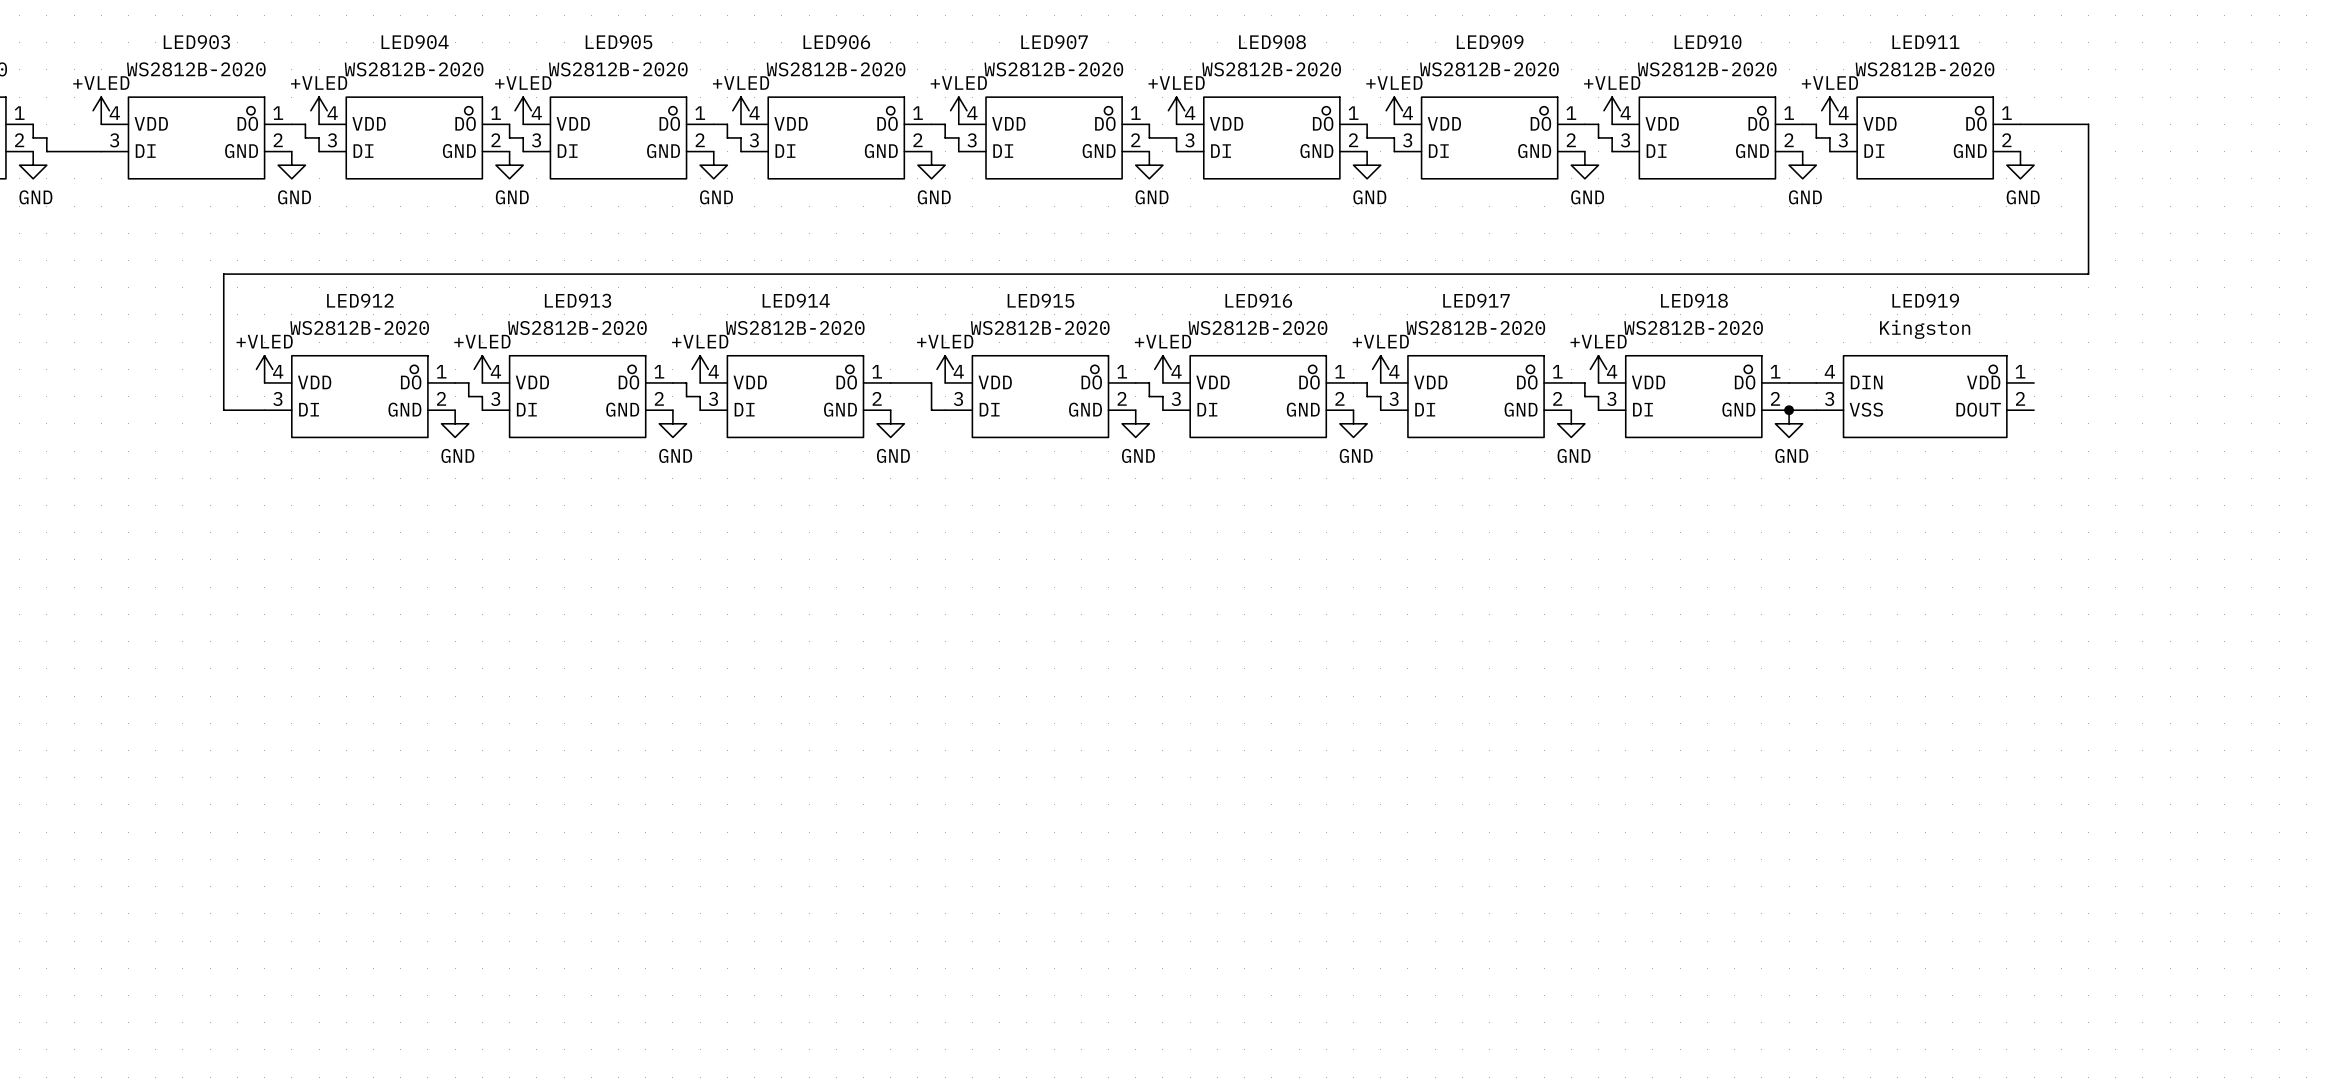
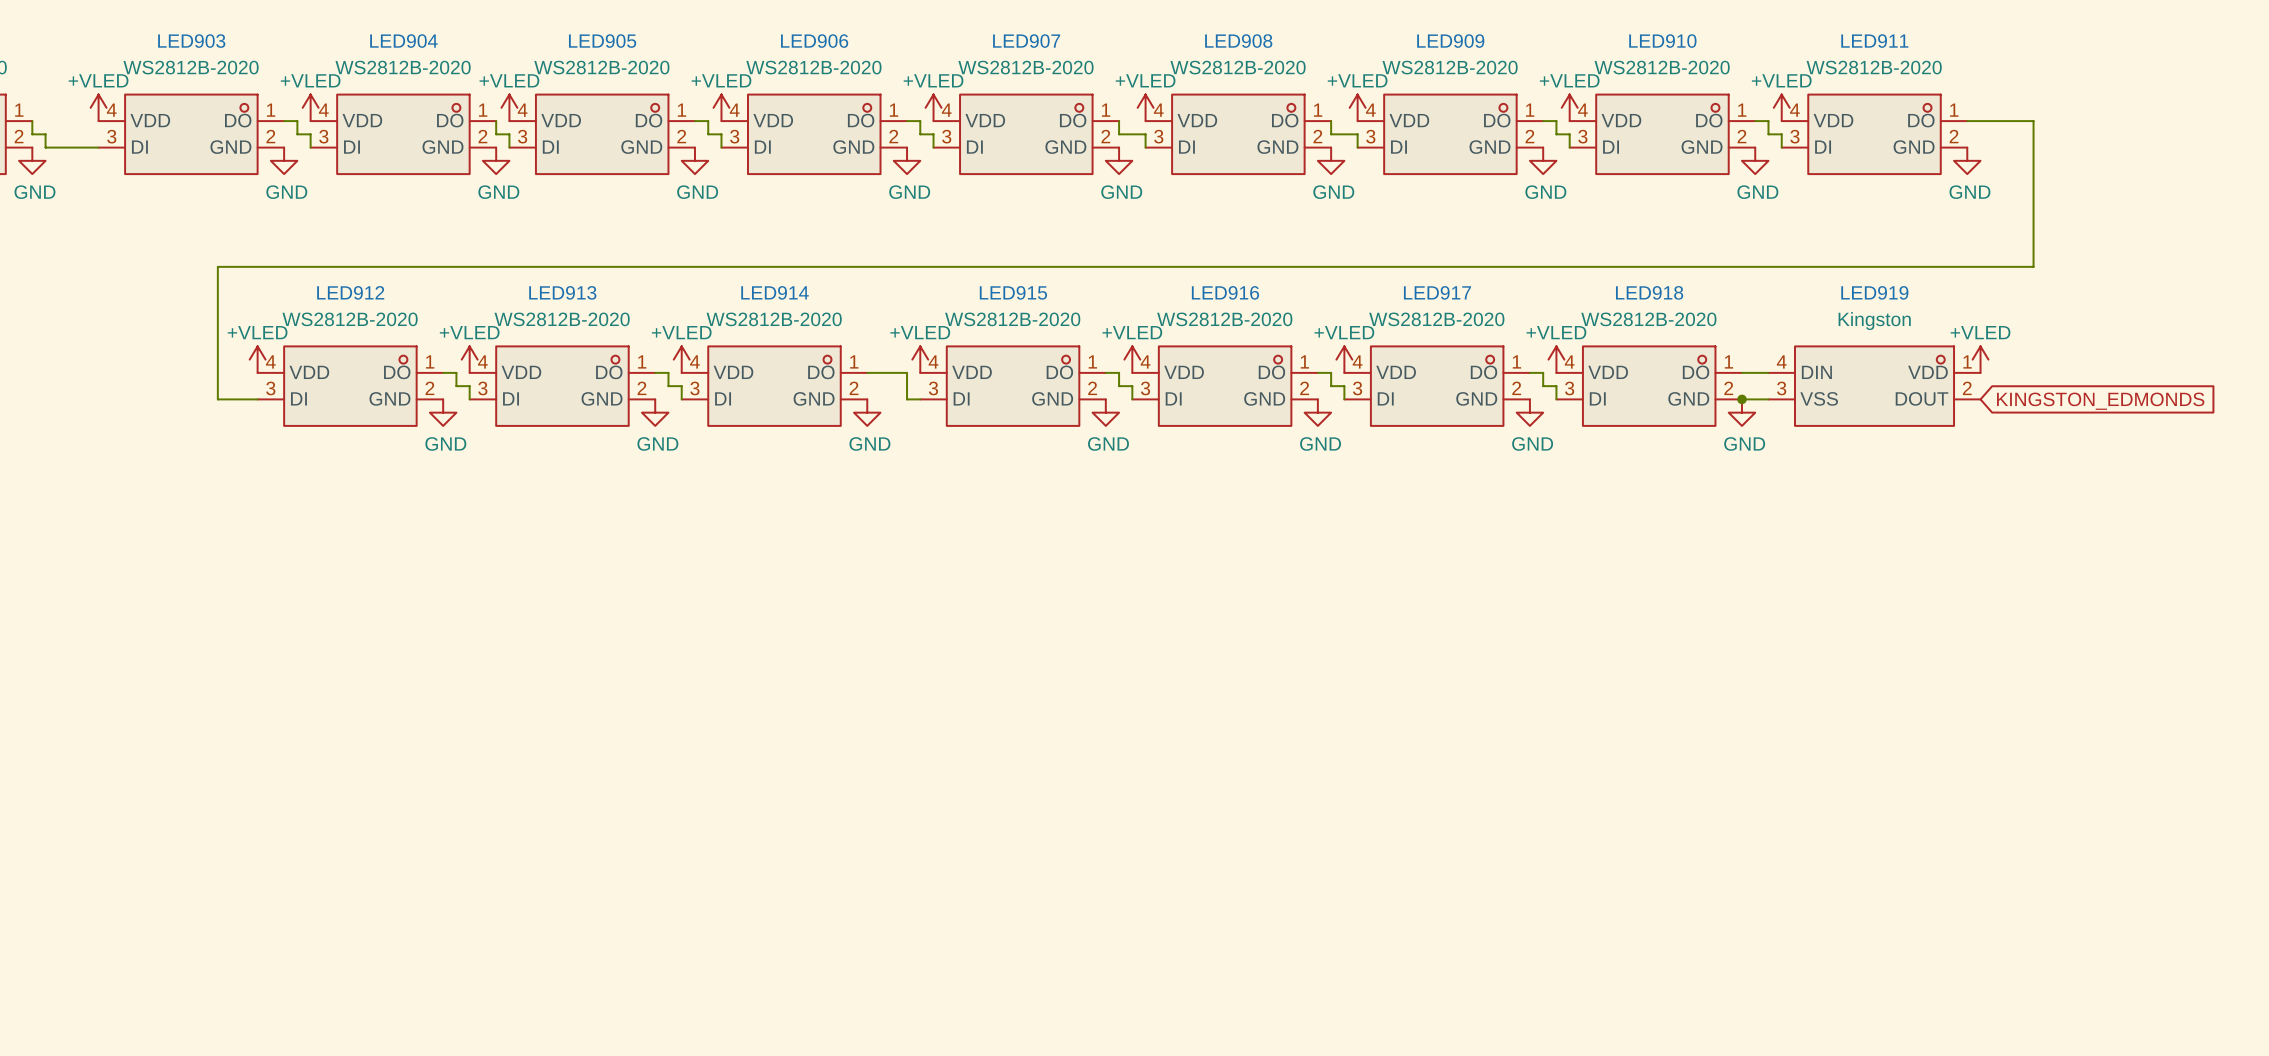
power symbol: none -> +VLED (1980, 359)
global label: none -> KINGSTON_EDMONDS (2100, 401)

